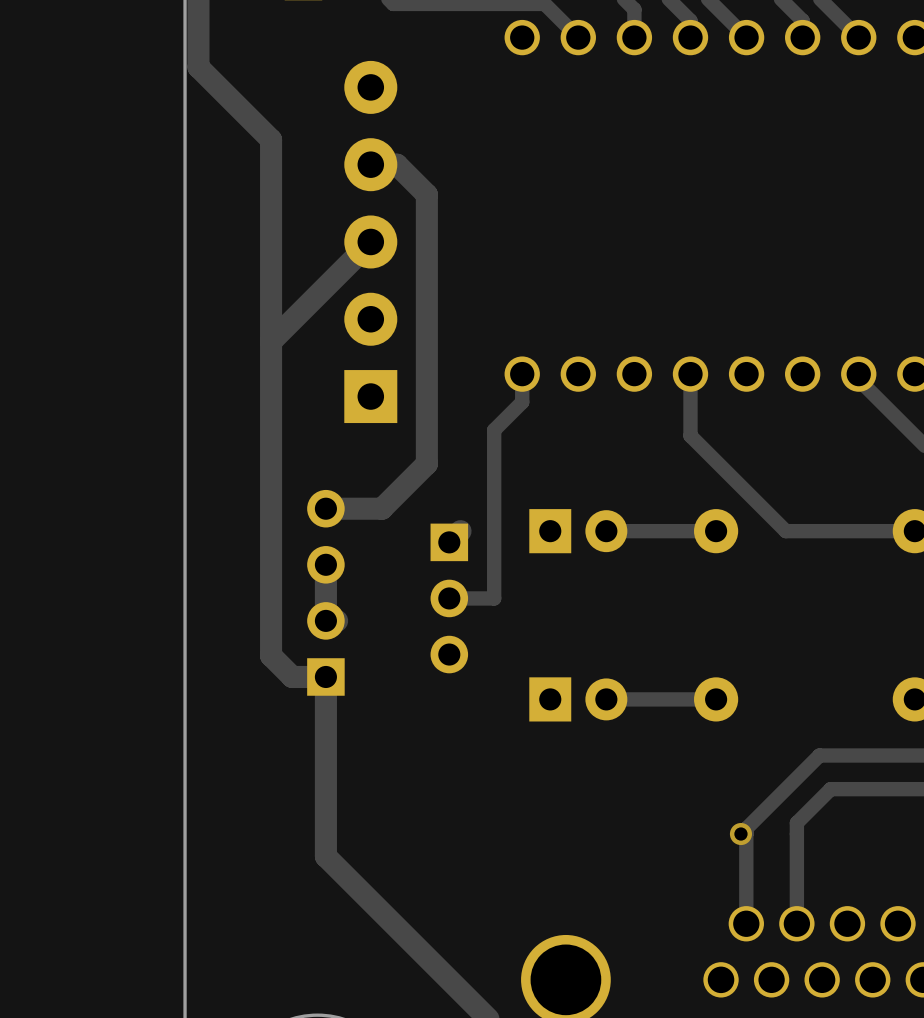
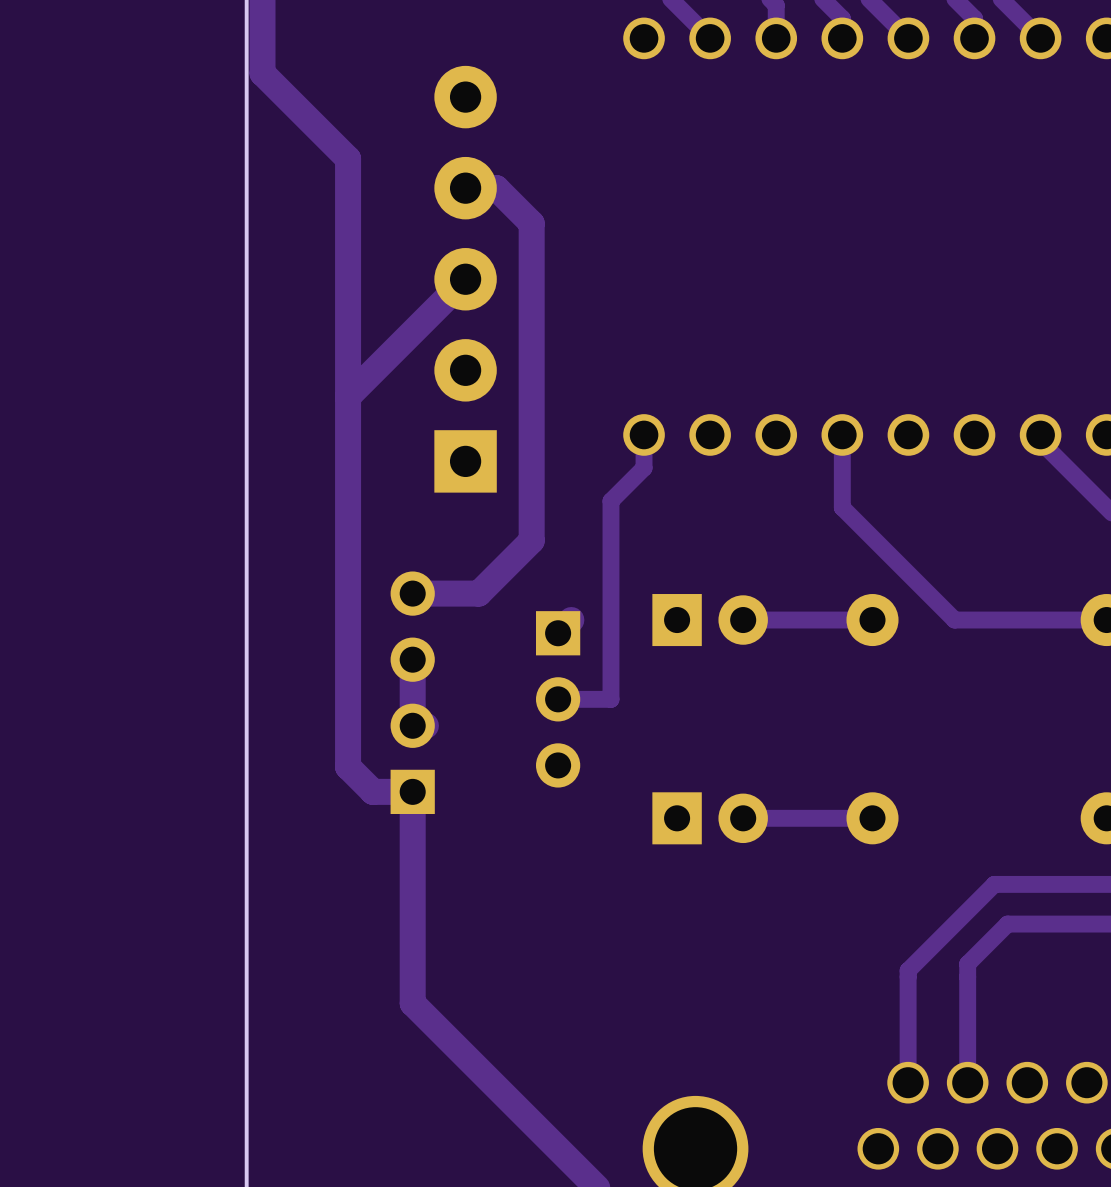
via: (740, 834) -> none

